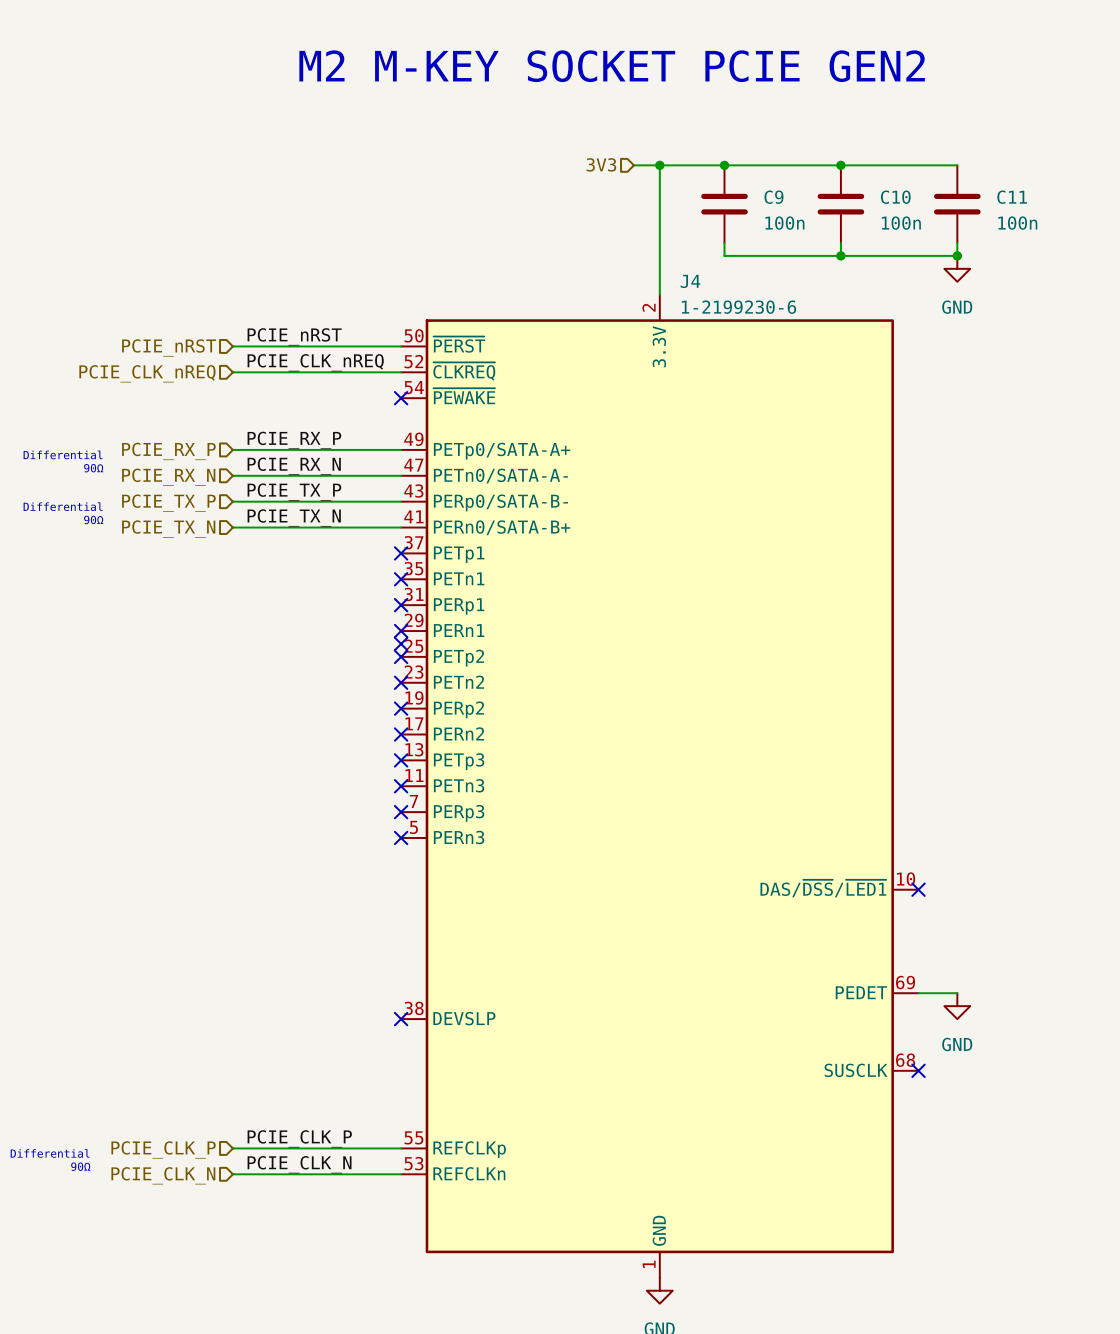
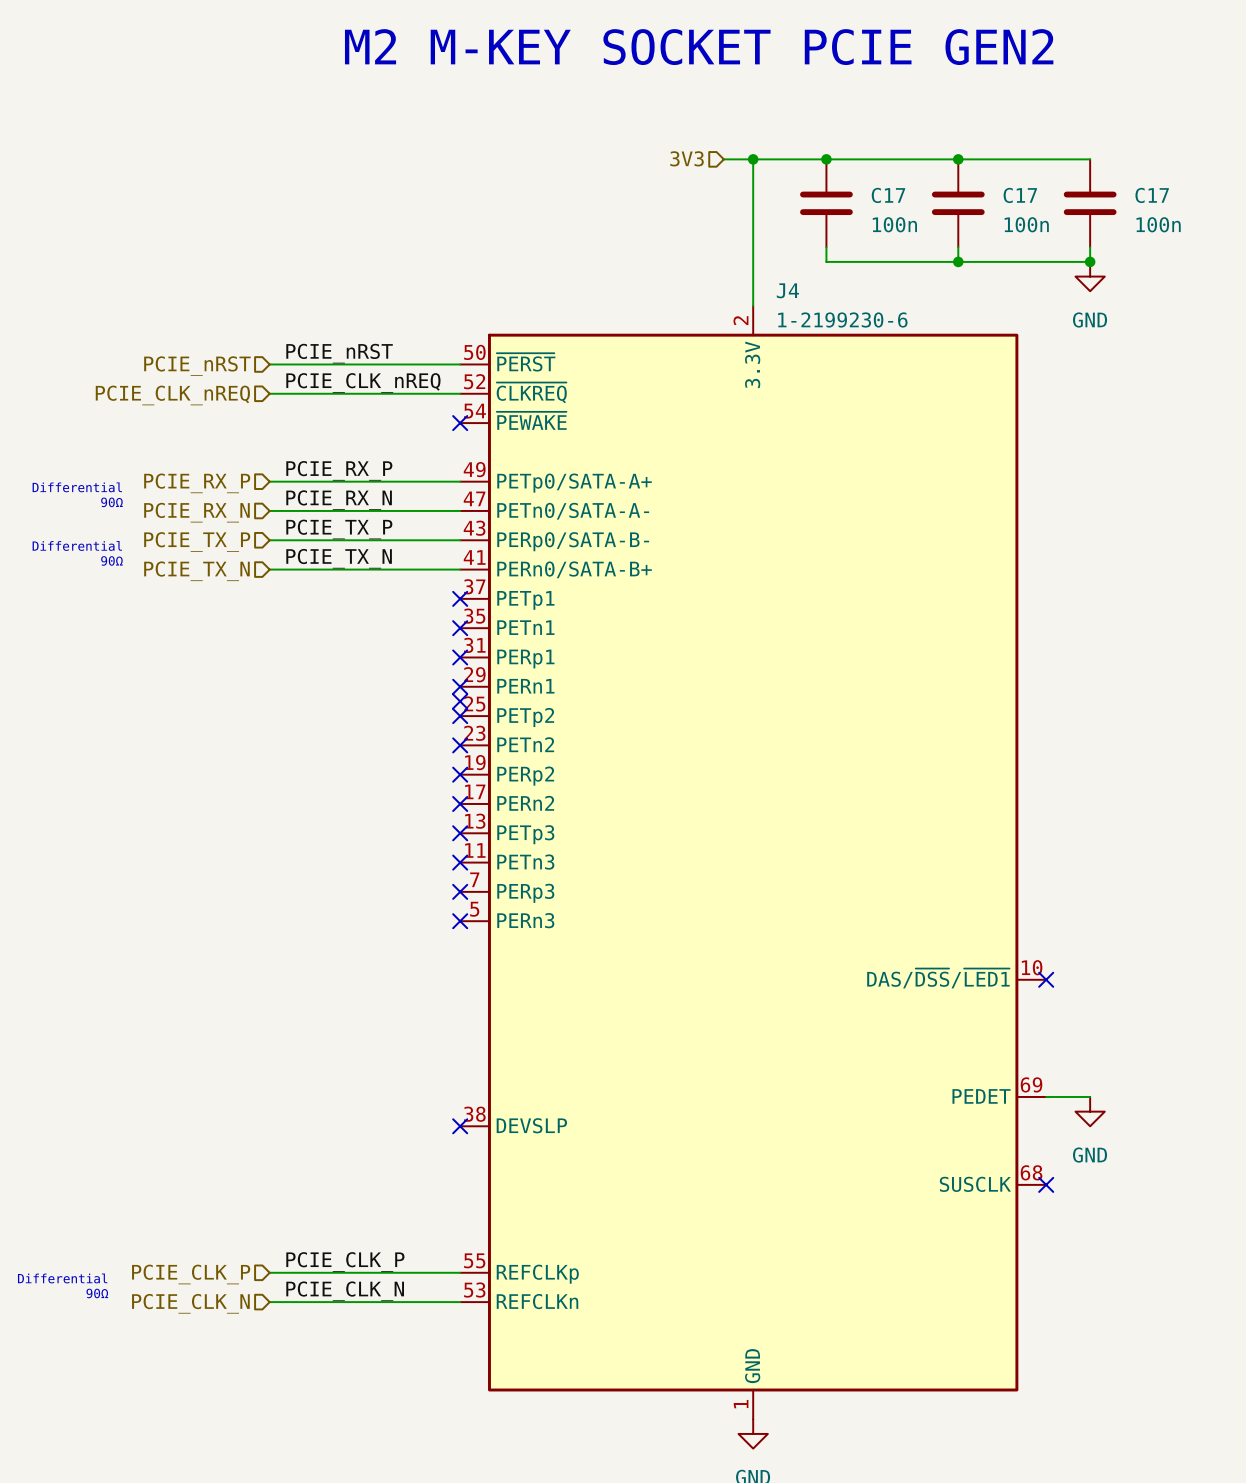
C9 name: C9 (773, 197) -> C17 (888, 195)
C10 name: C10 (895, 197) -> C17 (1020, 195)
C11 name: C11 (1012, 197) -> C17 (1152, 195)

